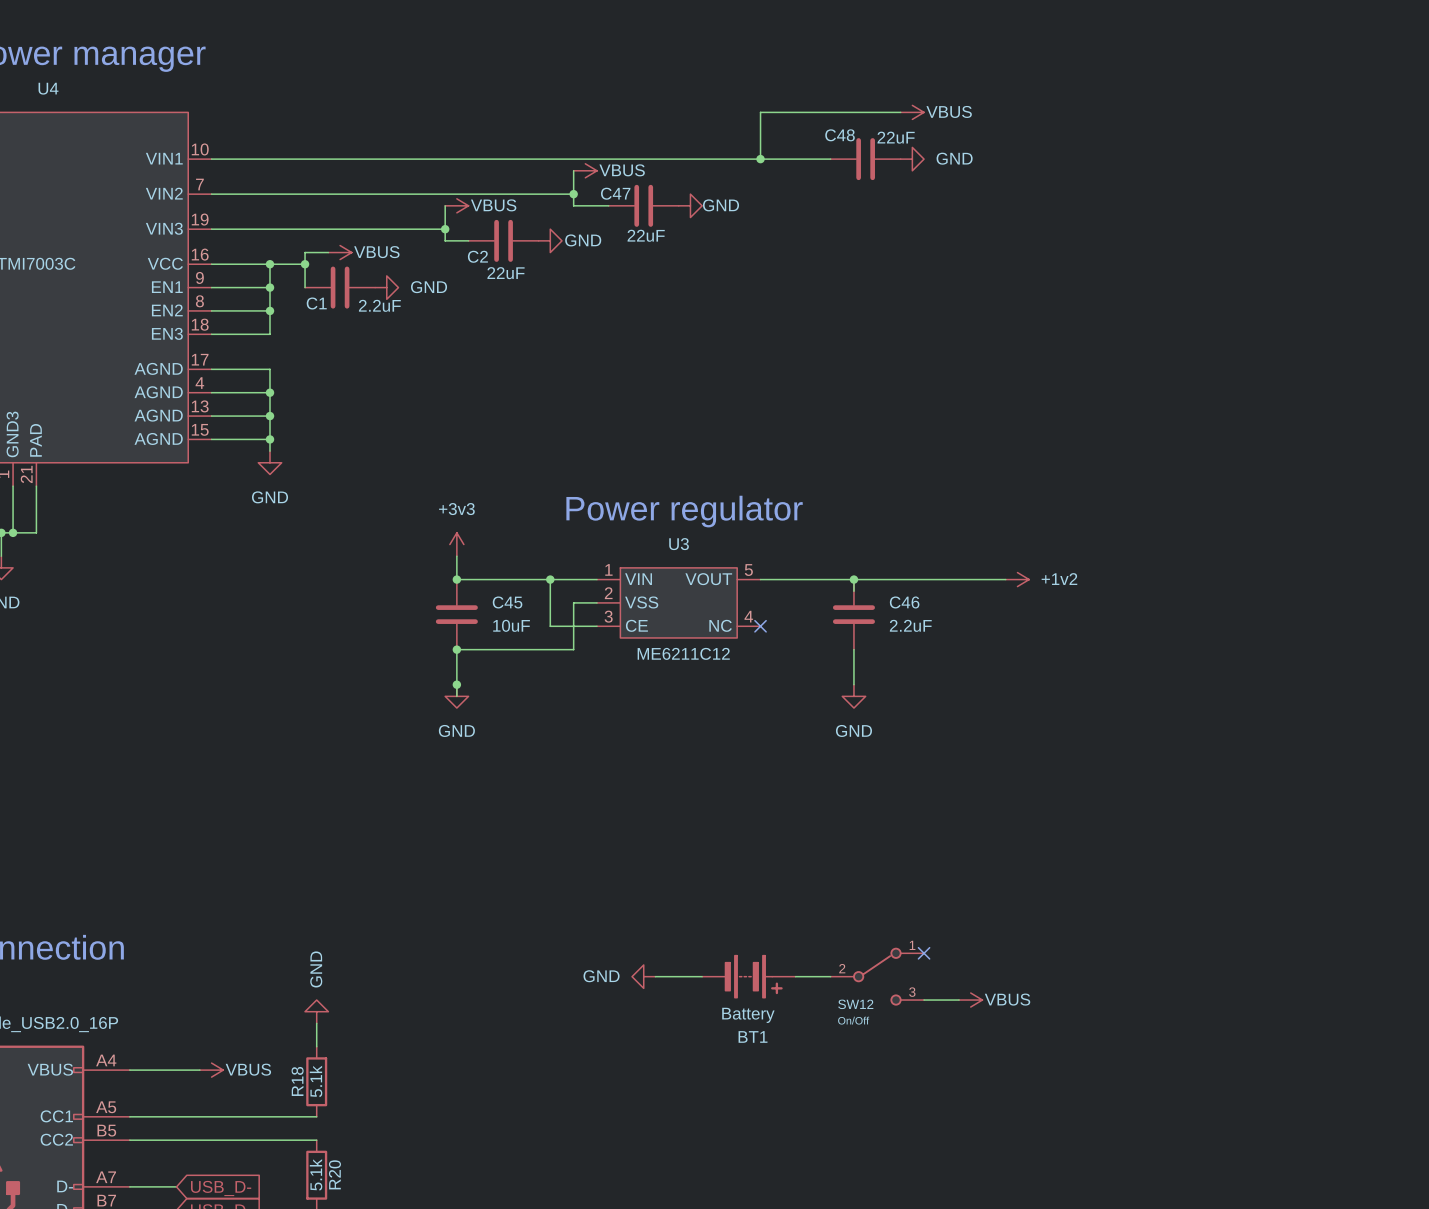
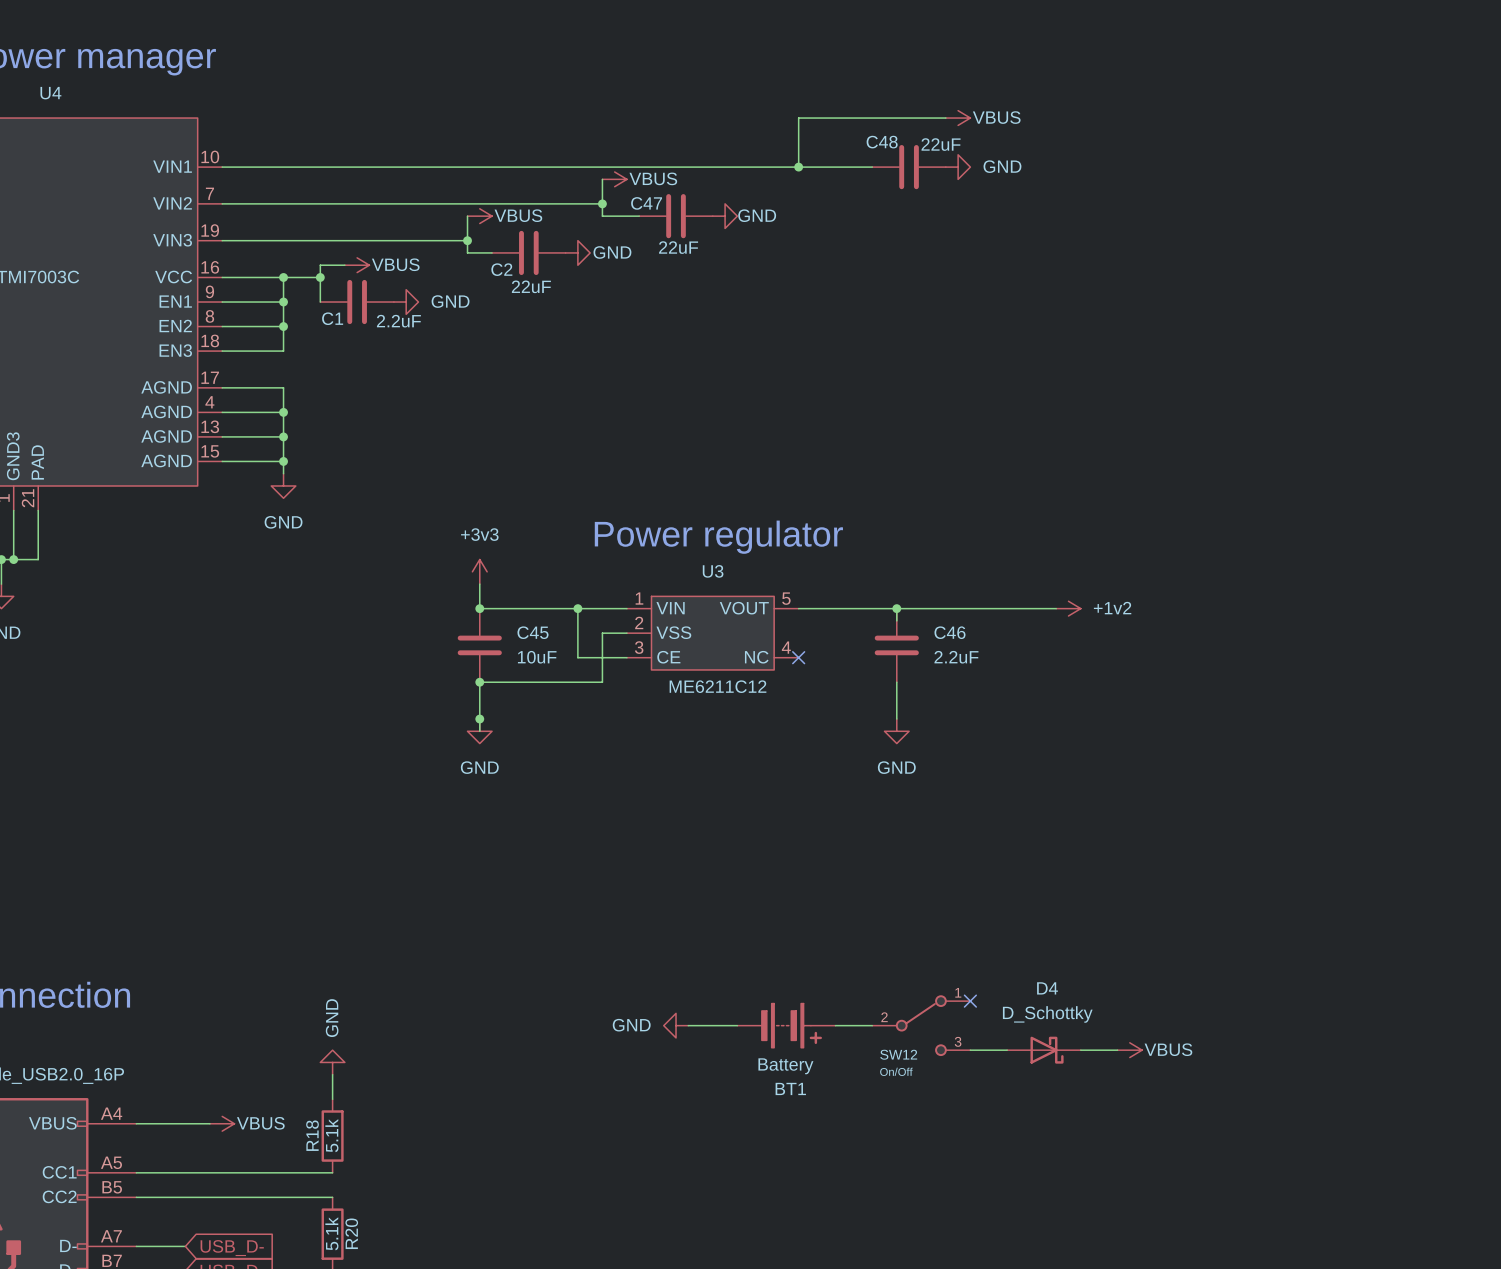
power symbol position: VBUS (970, 1000) -> VBUS (1129, 1050)
D4: none -> D_Schottky (1043, 1050)
wire: none -> (1080, 1050) (1117, 1050)

